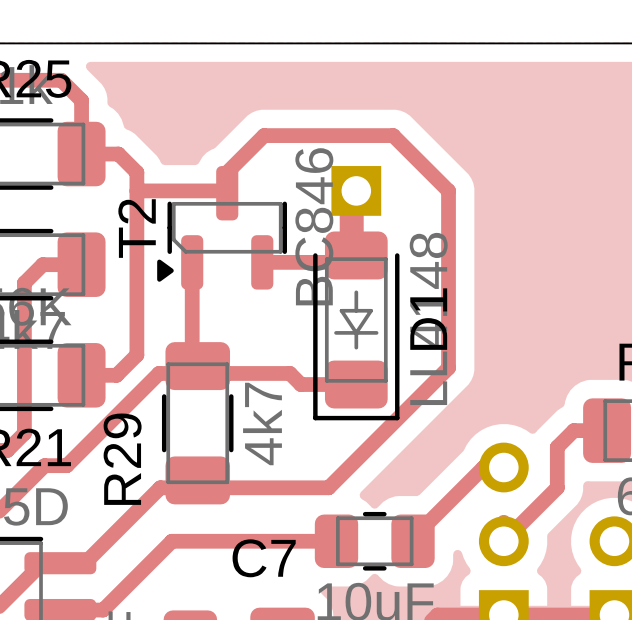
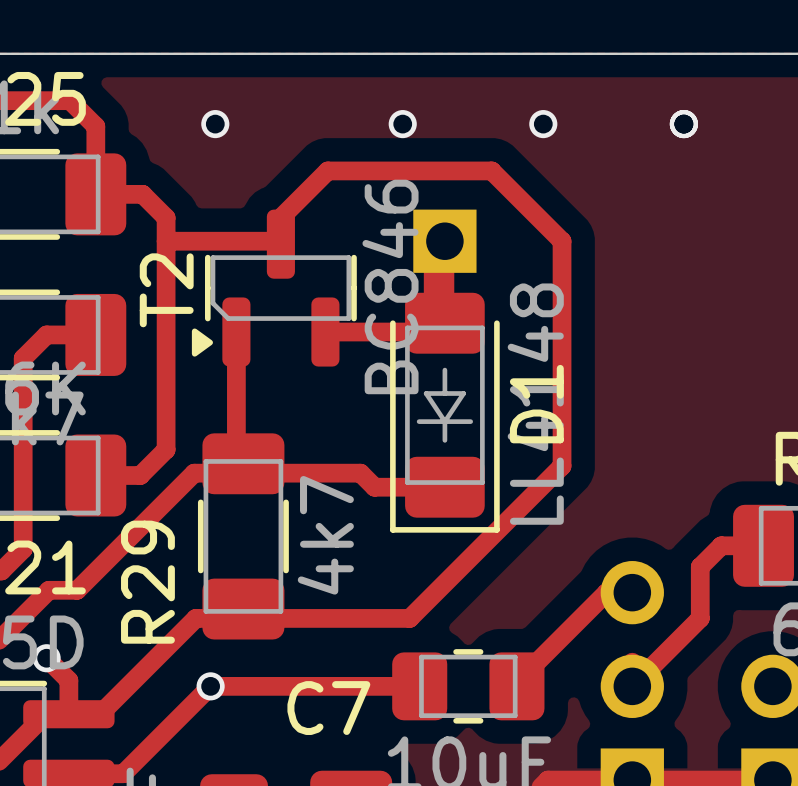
via: none -> (215, 124)
via: none -> (402, 124)
via: none -> (543, 124)
via: none -> (683, 124)
track: none -> (46, 658) (68, 680) (68, 714)
via: none -> (46, 658)
via: none -> (210, 686)

